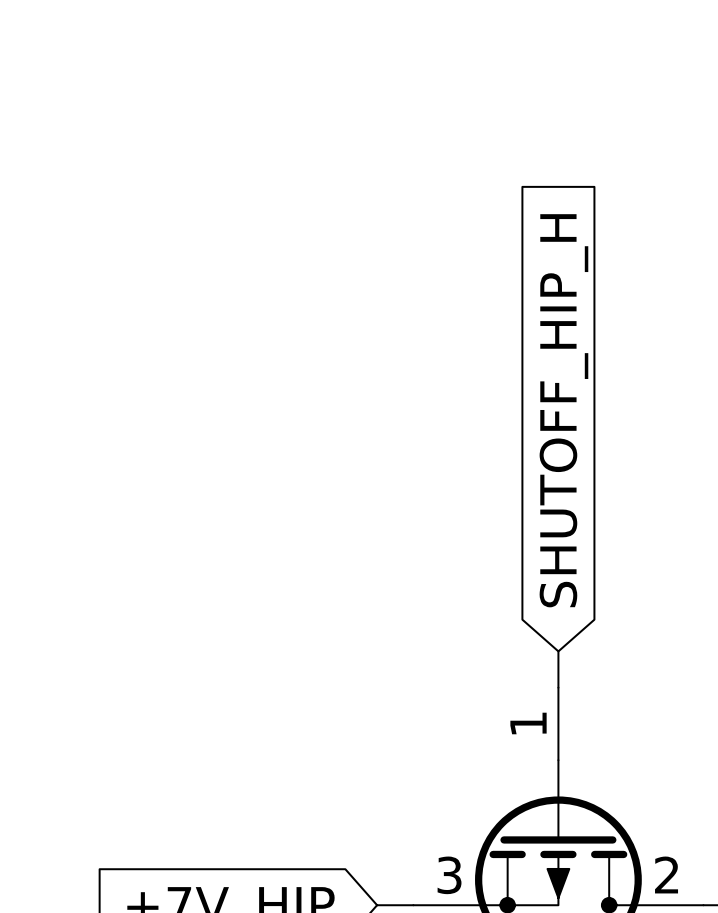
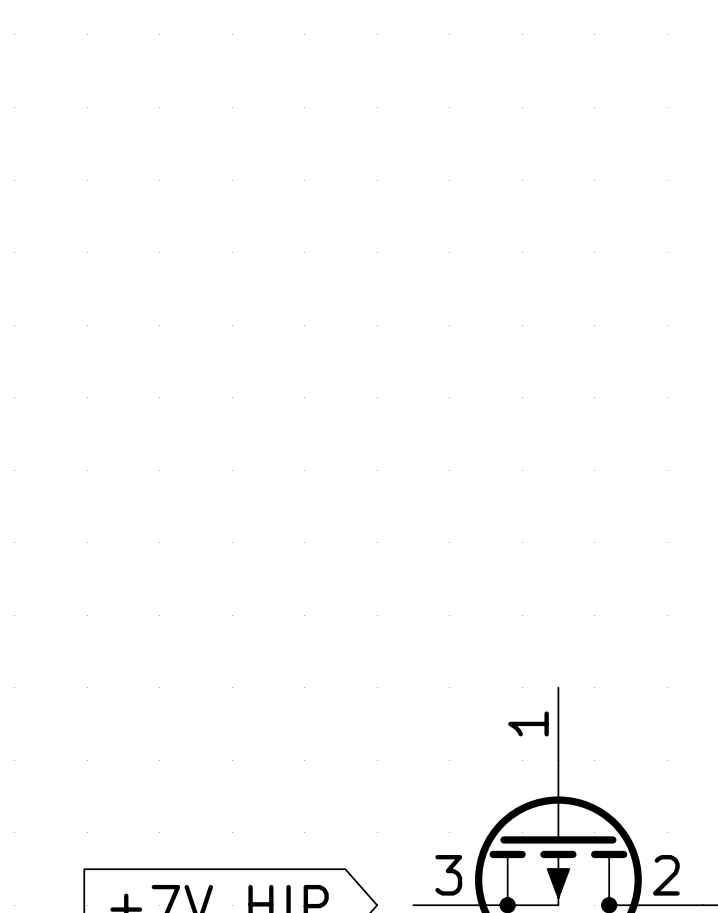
global label: SHUTOFF_HIP_H (563, 410) -> none
wire: (558, 651) (558, 687) -> none
wire: (377, 905) (413, 905) -> none

